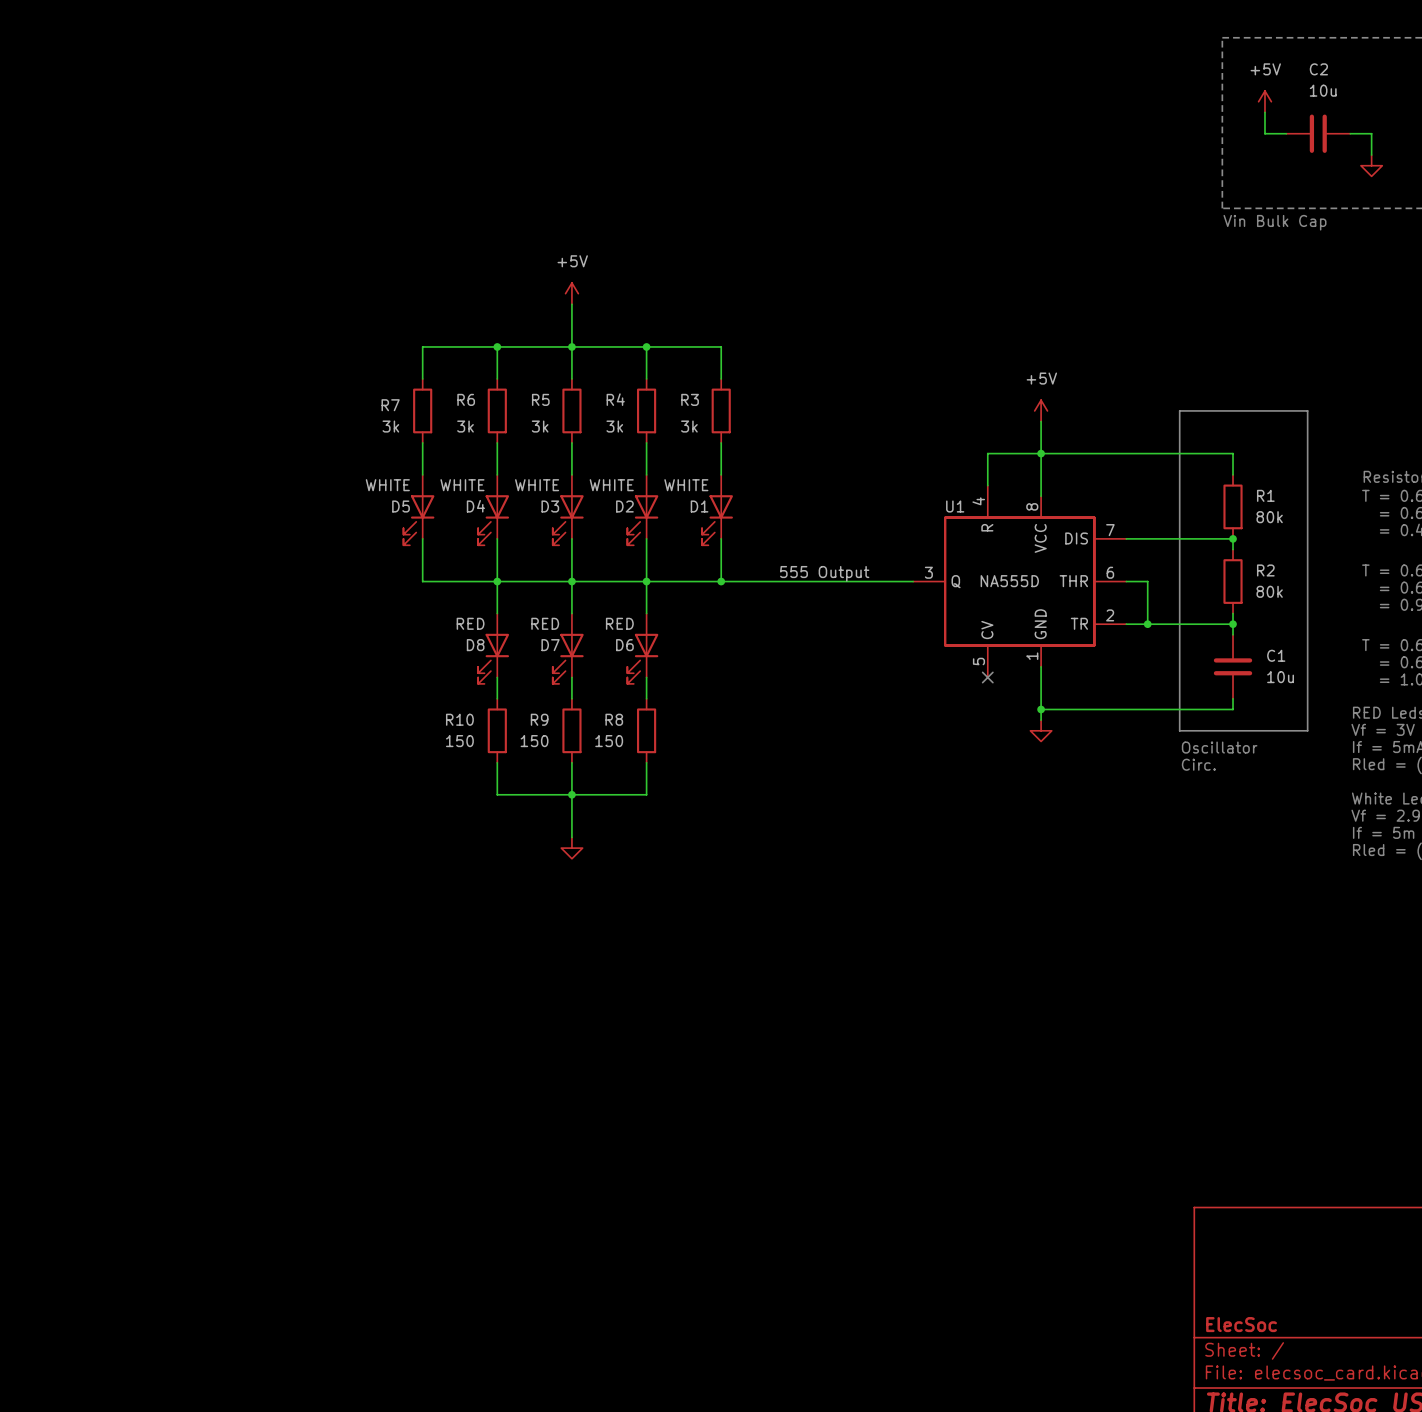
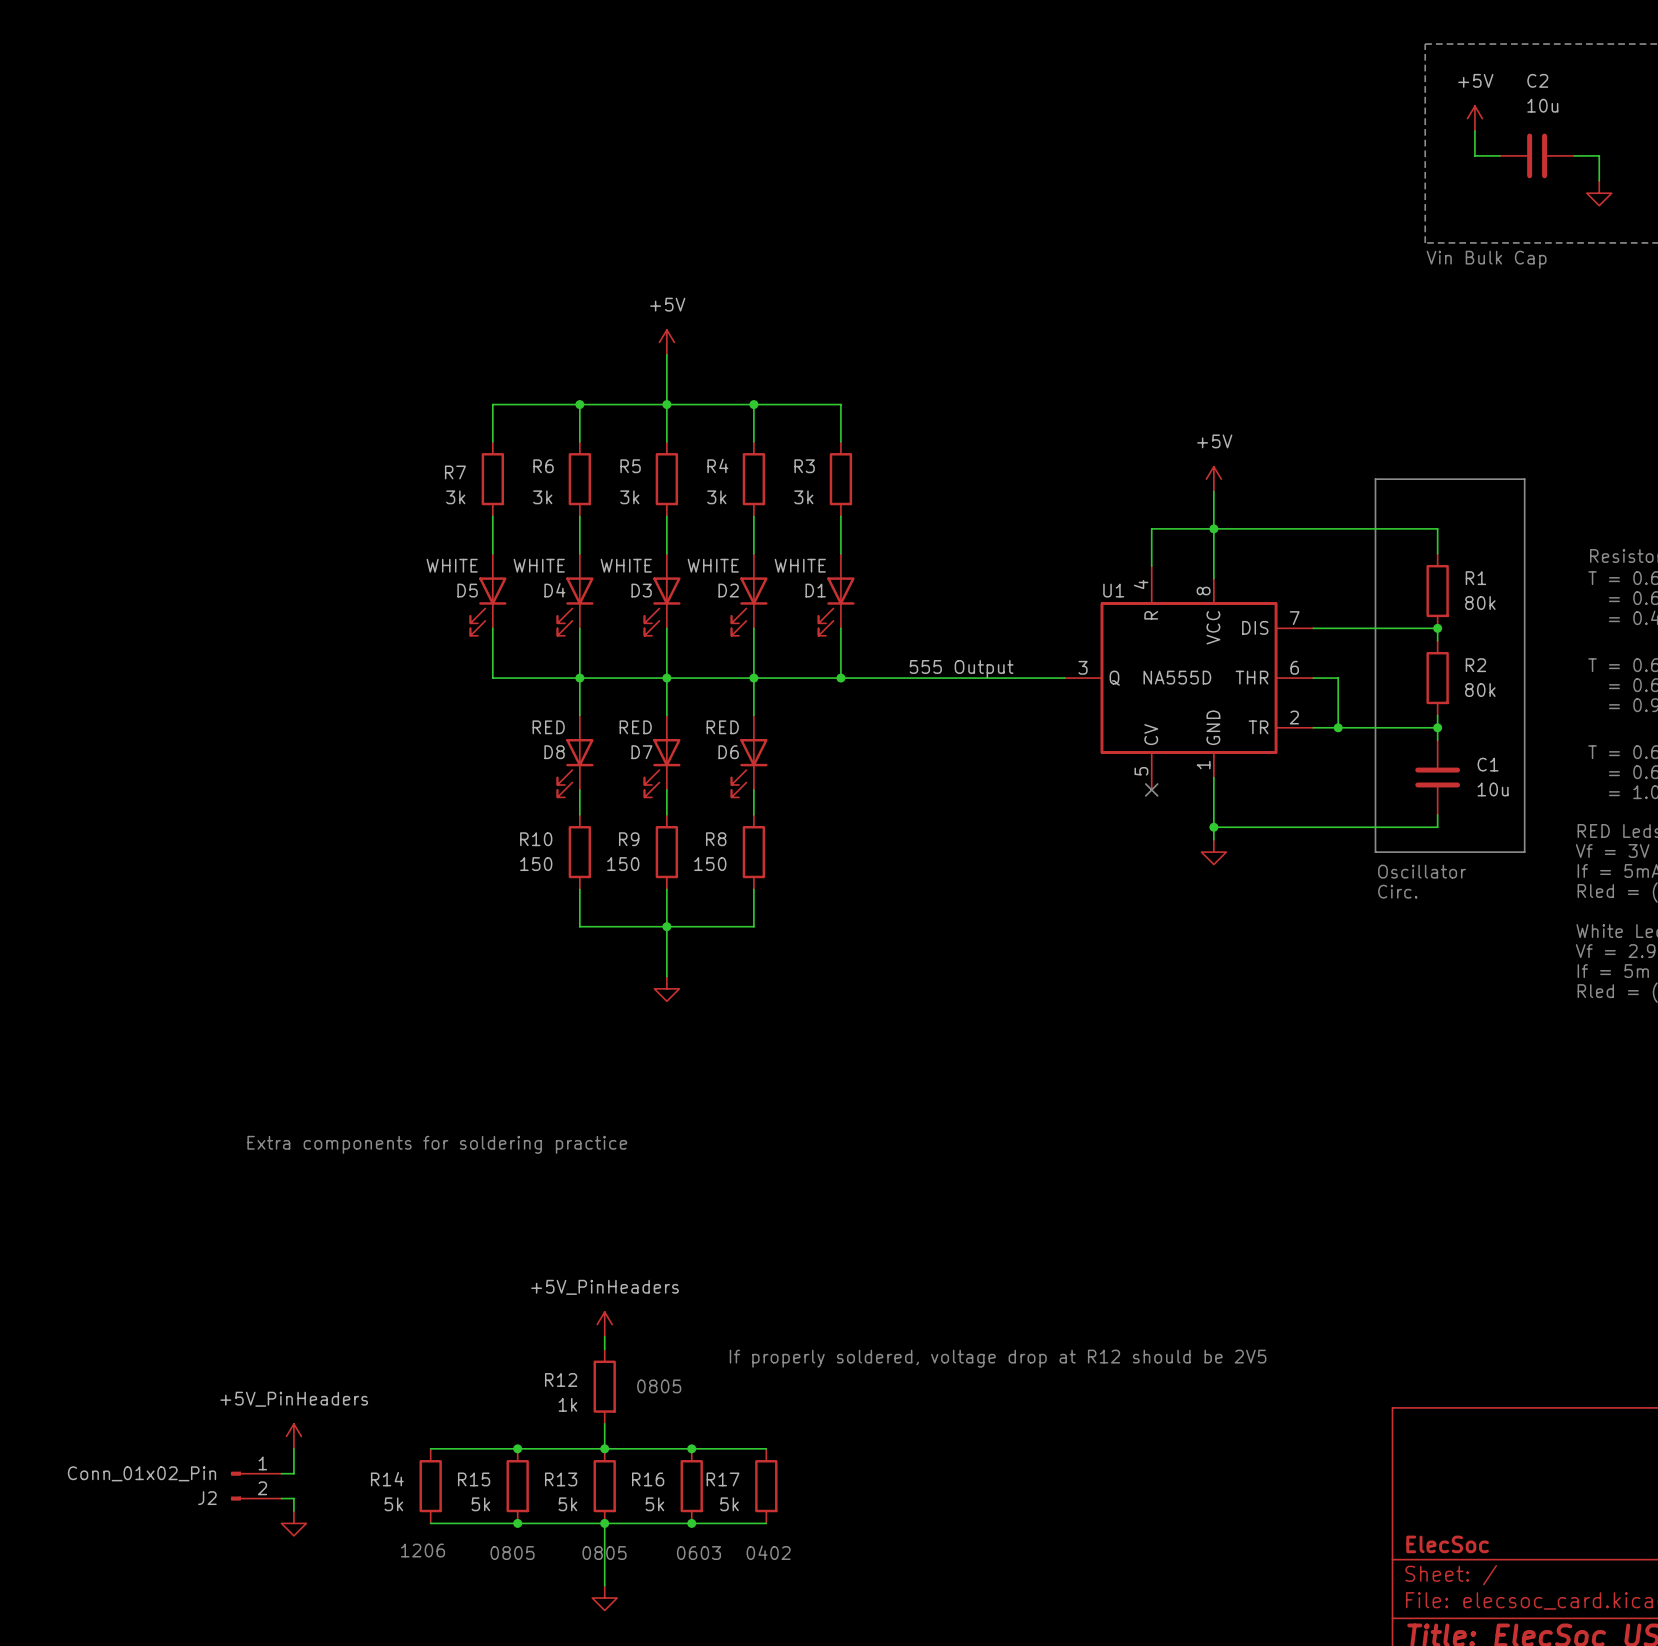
text: none -> Extra components for soldering practice (437, 1144)
power symbol: none -> +5V_PinHeaders (604, 1324)
wire: none -> (604, 1336) (604, 1349)
text: none -> If properly soldered, voltage drop at R12 should be 2V5 (998, 1358)
R12: none -> 1k (604, 1386)
text: none -> 0805 (659, 1386)
wire: none -> (604, 1423) (604, 1448)
power symbol: none -> +5V_PinHeaders (293, 1436)
wire: none -> (293, 1448) (293, 1473) (281, 1473)
wire: none -> (430, 1448) (766, 1448)
junction: none -> (517, 1448)
junction: none -> (604, 1448)
junction: none -> (691, 1448)
J2: none -> Conn_01x02_Pin (256, 1486)
R14: none -> 5k (430, 1486)
R15: none -> 5k (517, 1486)
R13: none -> 5k (604, 1486)
R16: none -> 5k (691, 1486)
R17: none -> 5k (766, 1486)
wire: none -> (281, 1498) (293, 1498) (293, 1510)
power symbol: none -> (293, 1523)
wire: none -> (430, 1523) (766, 1523)
junction: none -> (517, 1523)
wire: none -> (604, 1523) (604, 1585)
junction: none -> (604, 1523)
junction: none -> (691, 1523)
text: none -> 1206 (423, 1550)
text: none -> 0805 (512, 1553)
text: none -> 0805 (604, 1553)
text: none -> 0603 (698, 1553)
text: none -> 0402 (768, 1552)
power symbol: none -> (604, 1598)

